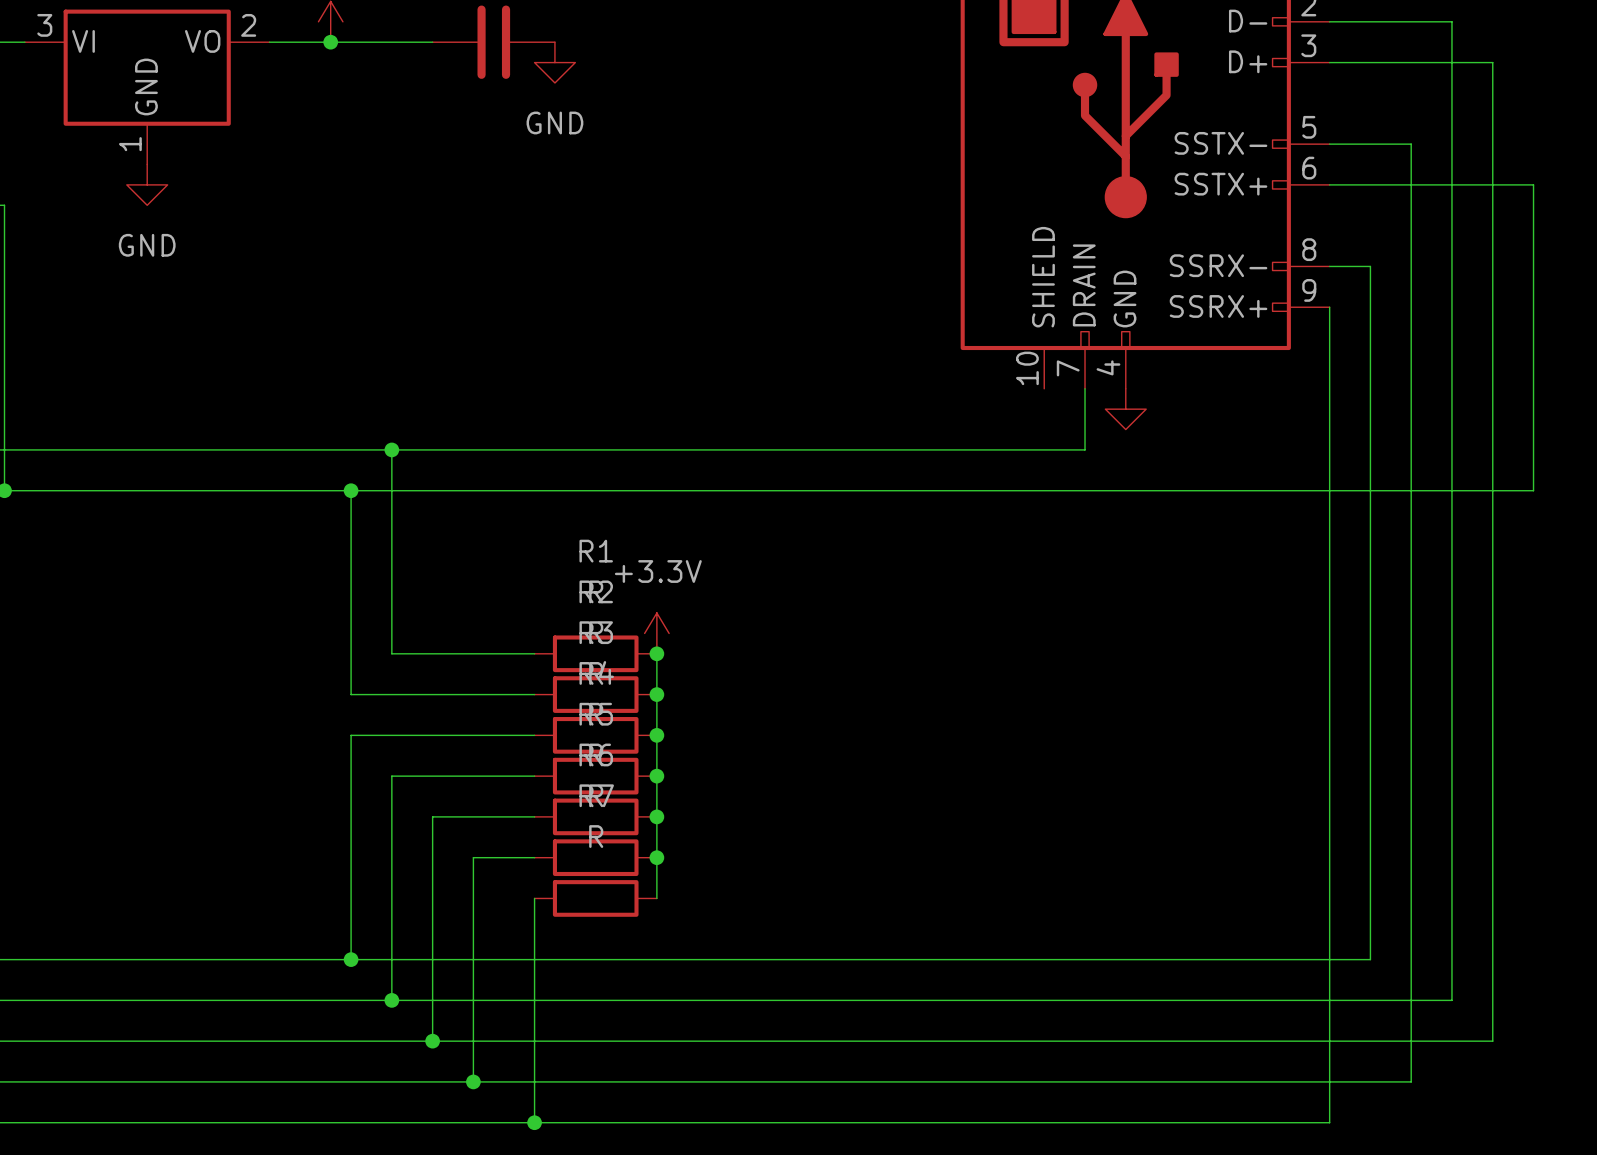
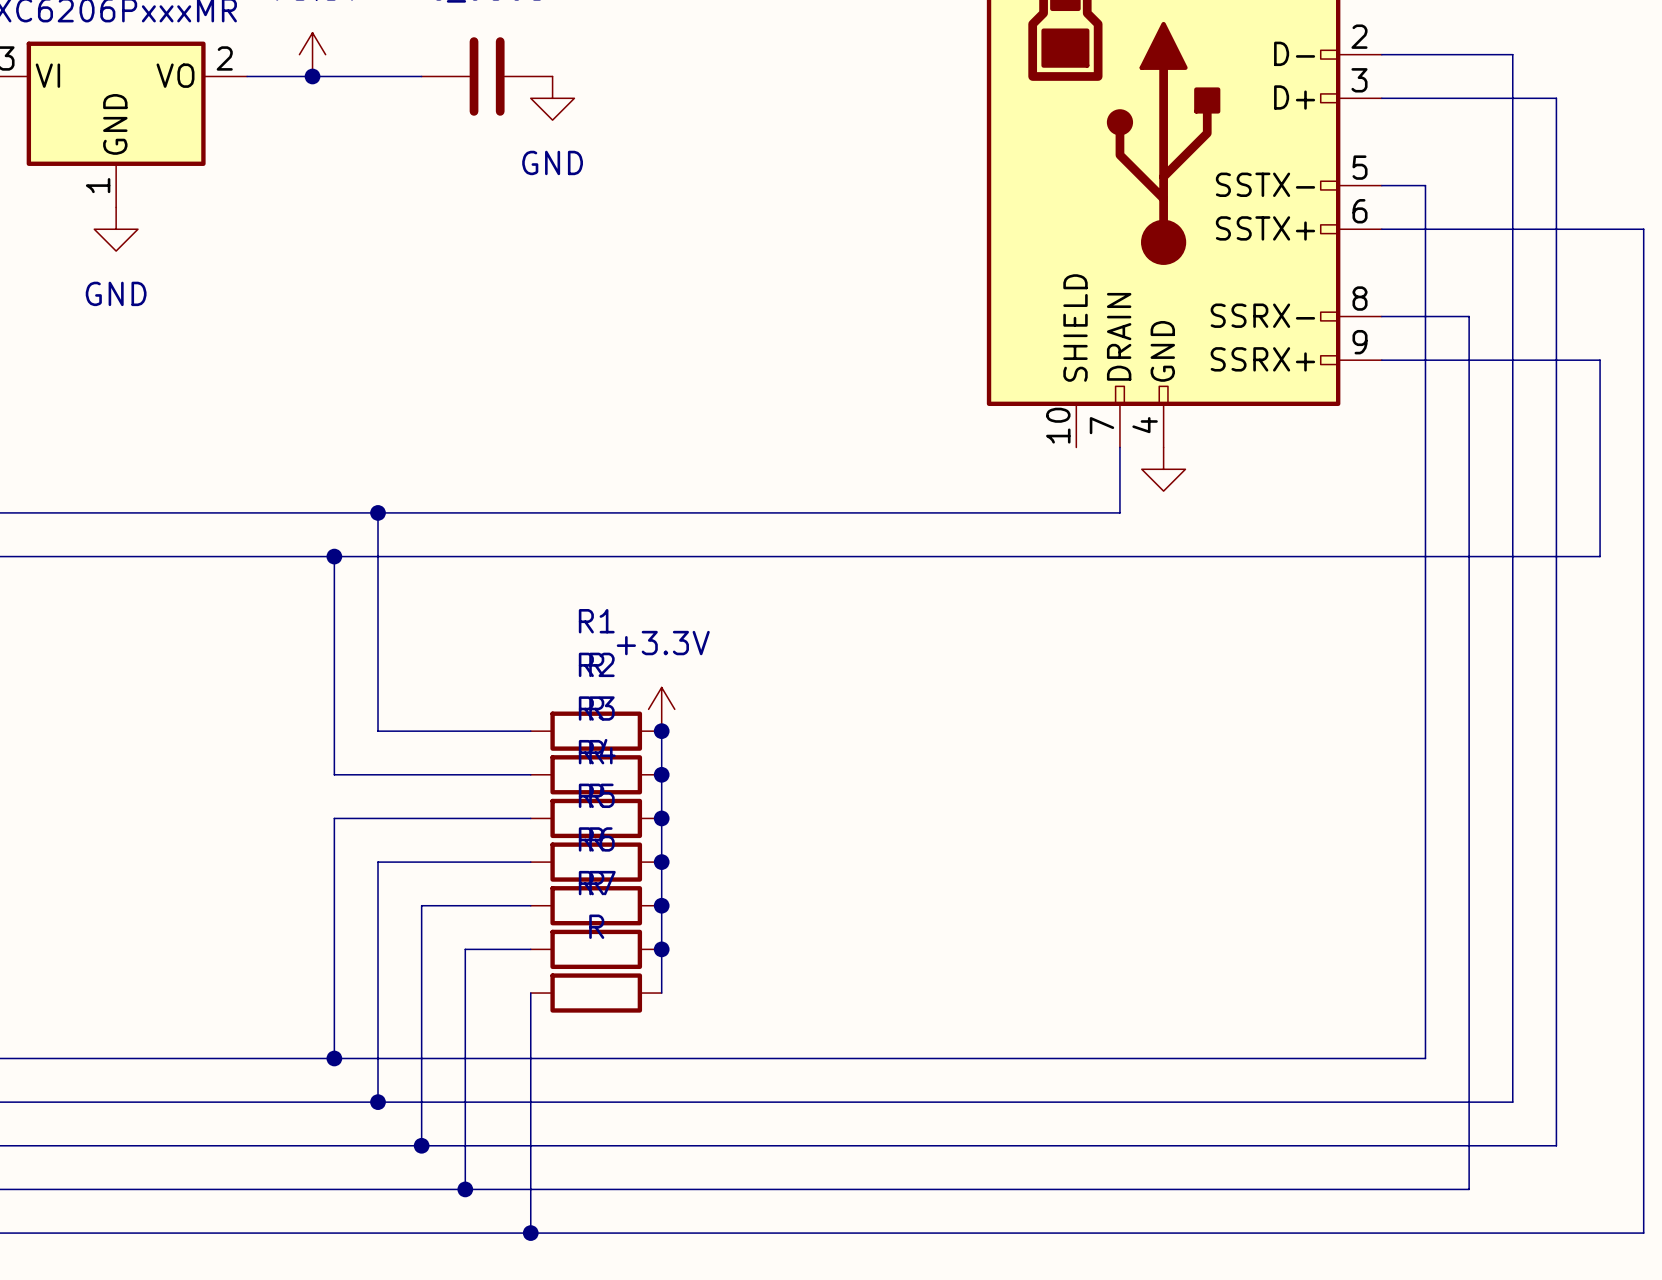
wire: (1370, 144) (1411, 144) (1411, 266) -> (1425, 185) (1425, 316) (1469, 316)
wire: (1533, 184) (1533, 307) -> (1381, 360) (1600, 360)
wire: (1329, 307) (1329, 1122) -> (1600, 229) (1643, 229) (1643, 1233) (1381, 1233)

